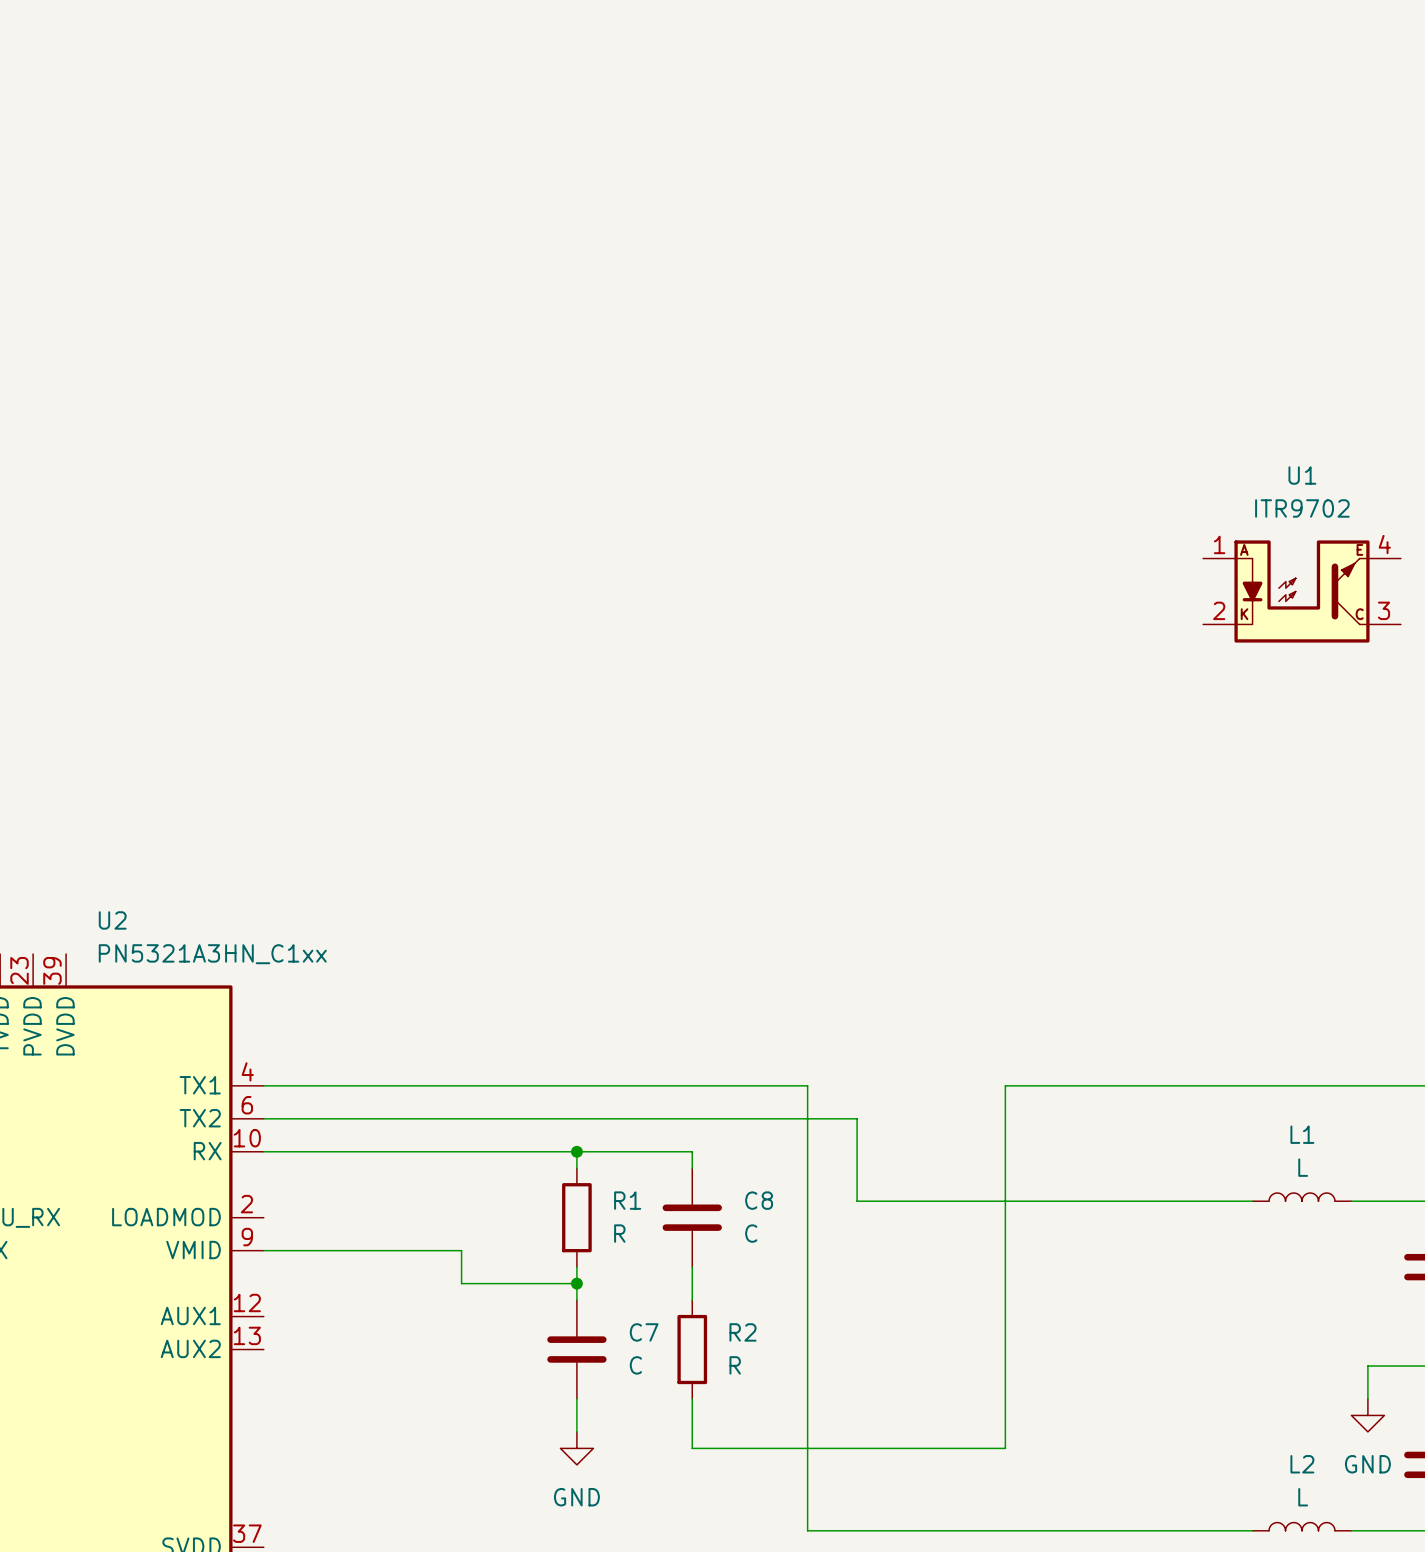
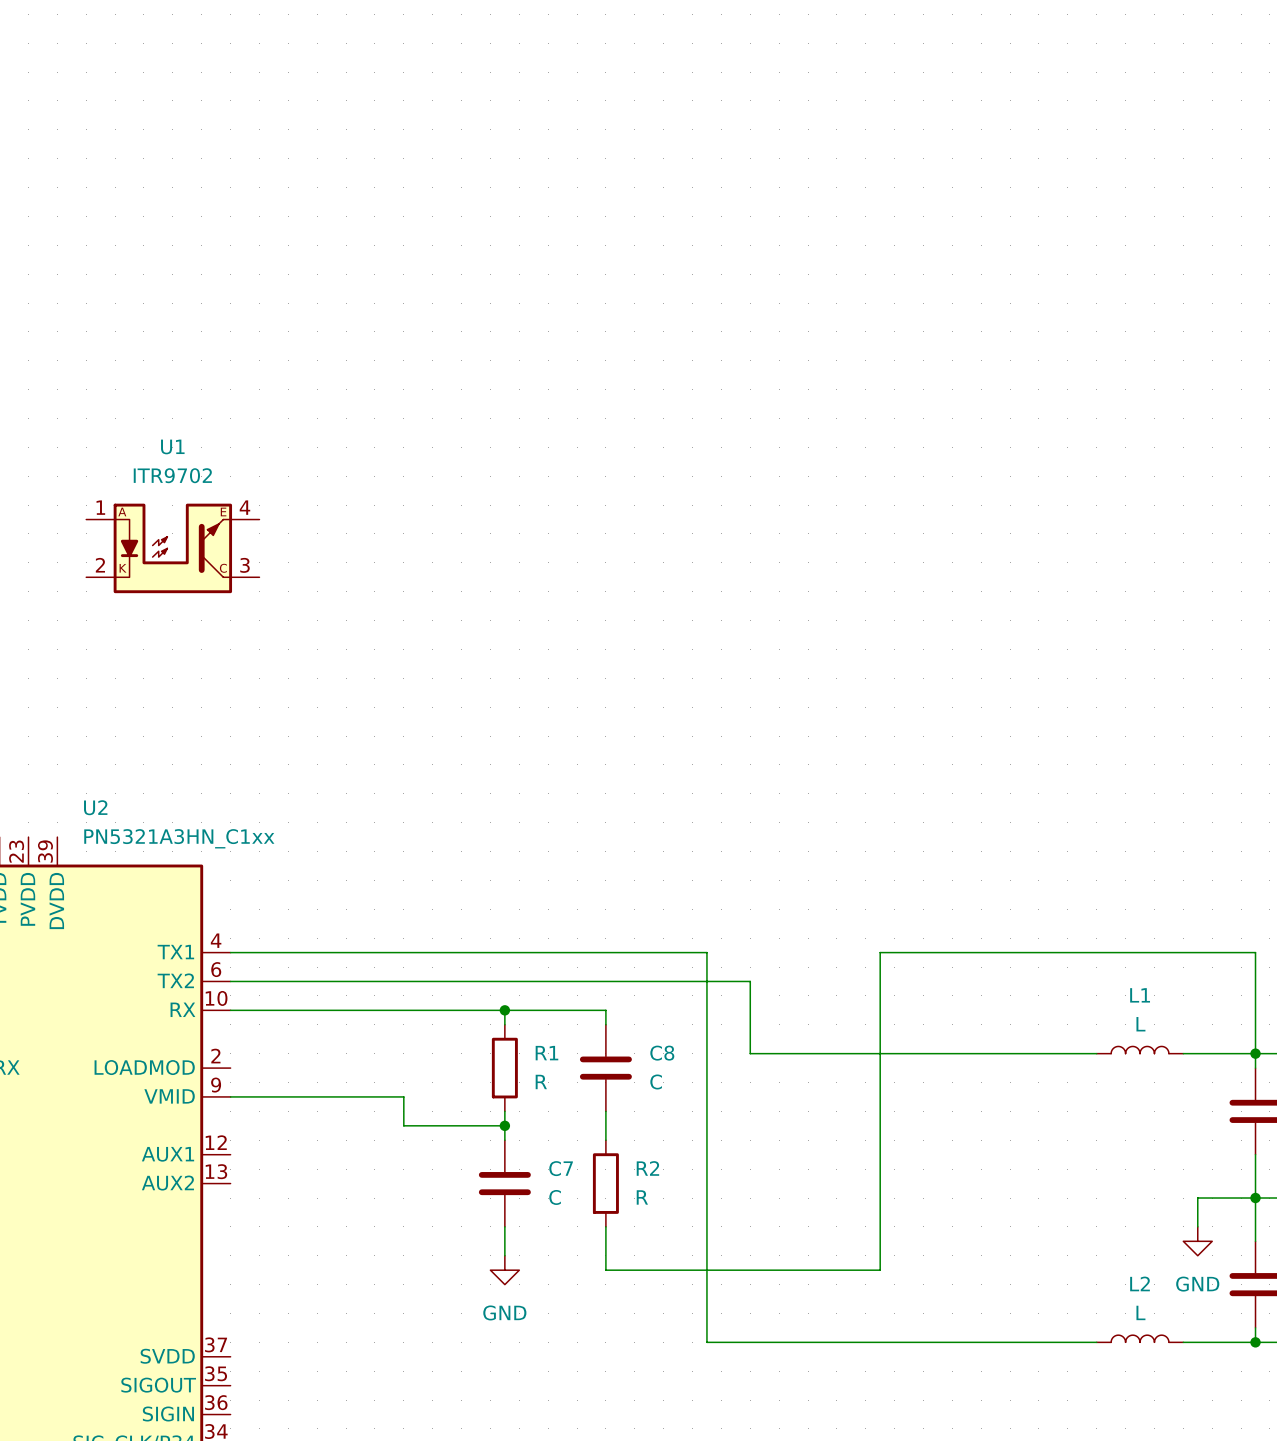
U1 position: (1302, 591) -> (172, 548)

